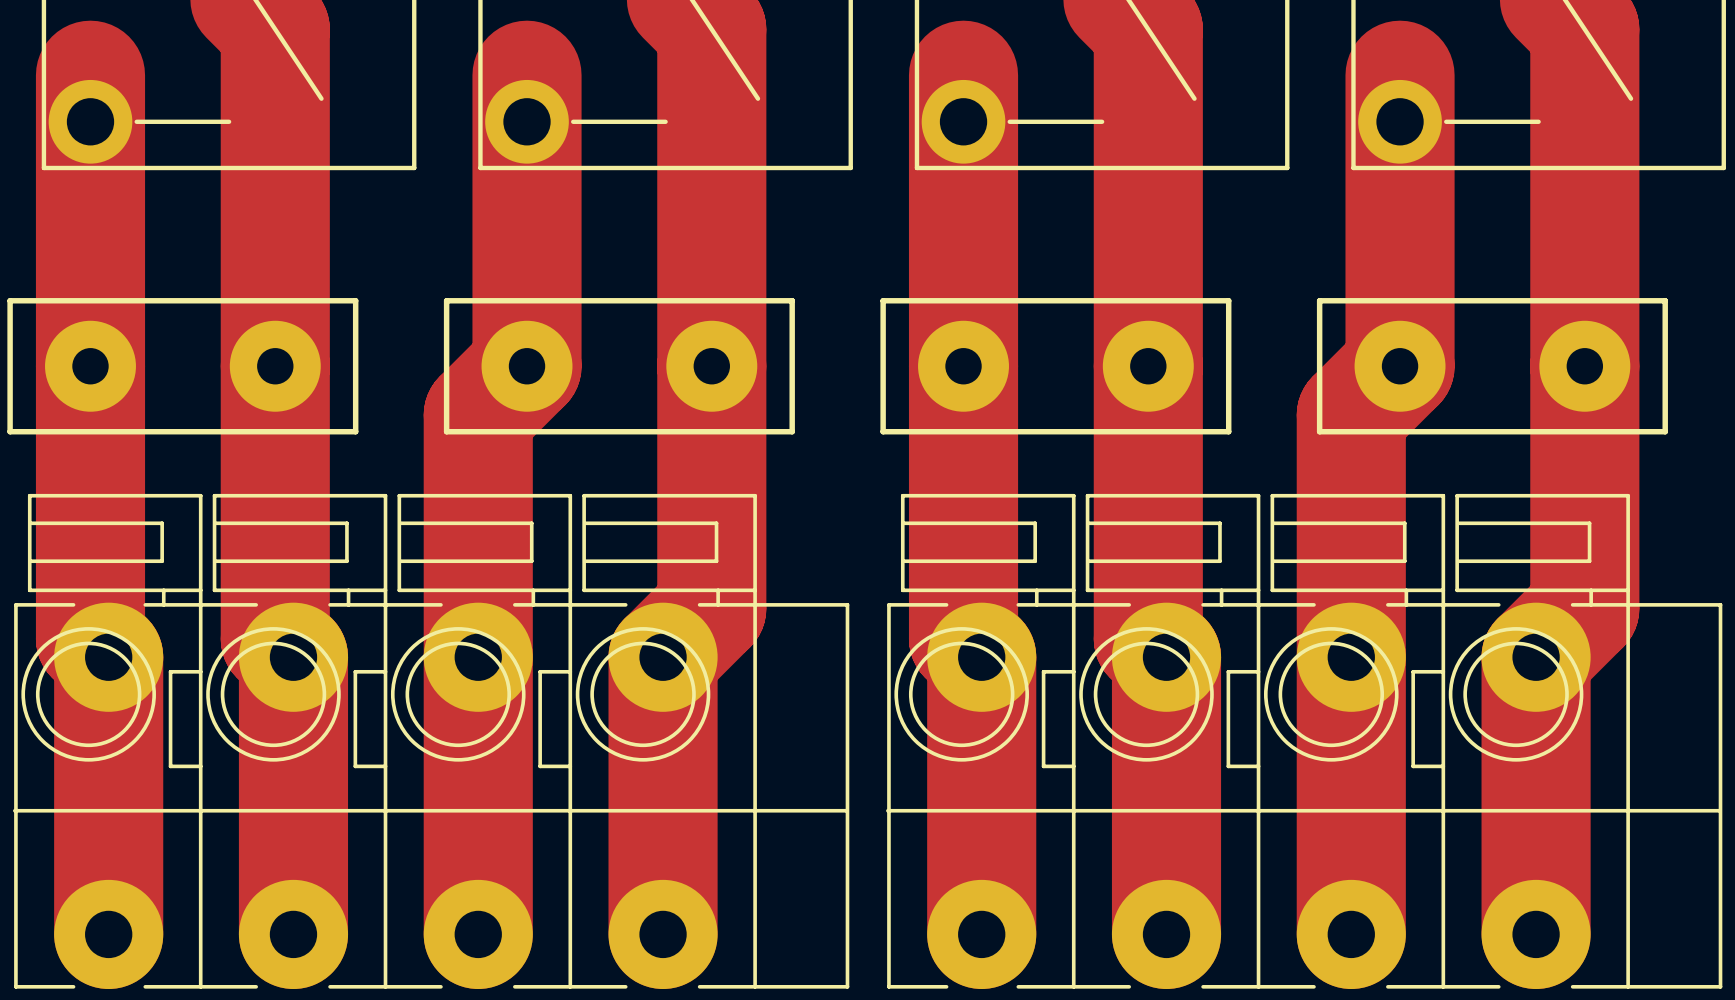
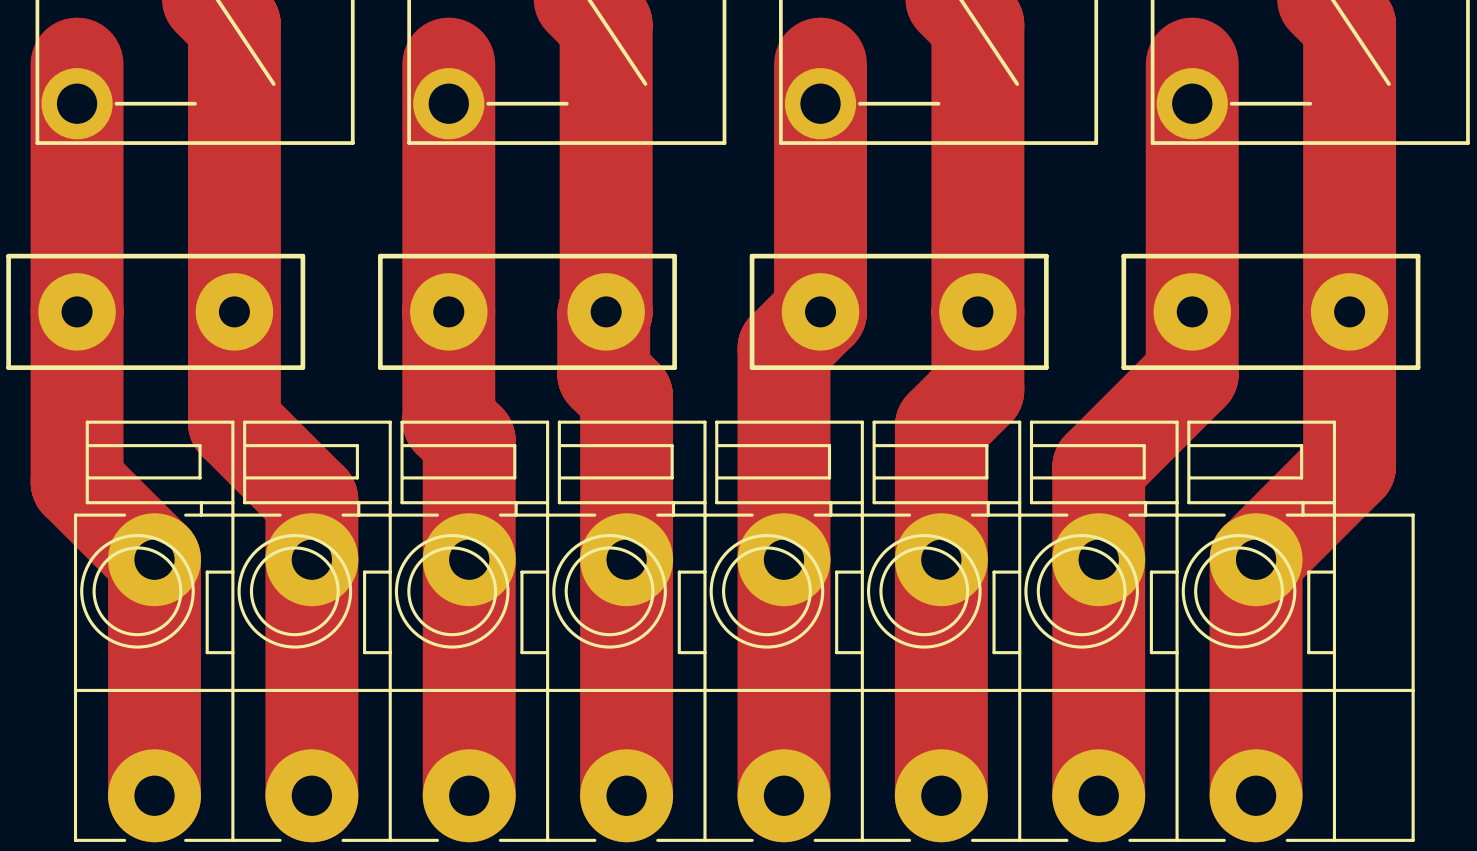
track: (527, 366) (478, 414) (478, 934) -> (448, 311) (448, 420) (469, 440) (469, 795)
track: (711, 366) (711, 608) (663, 657) (663, 934) -> (606, 311) (603, 314) (603, 373) (626, 396) (626, 795)
track: (963, 366) (963, 639) (981, 657) (981, 934) -> (820, 311) (783, 348) (783, 795)
track: (1400, 366) (1351, 414) (1351, 934) -> (1192, 311) (1192, 373) (1098, 467) (1098, 795)
track: (1148, 457) (1148, 639) (1166, 657) (1166, 934) -> (977, 389) (941, 426) (941, 795)
track: (275, 496) (275, 639) (293, 657) (293, 934) -> (234, 422) (311, 500) (311, 795)
track: (1584, 547) (1584, 608) (1536, 657) (1536, 934) -> (1349, 466) (1256, 559) (1256, 795)
track: (90, 566) (90, 639) (108, 657) (108, 934) -> (77, 482) (154, 559) (154, 795)
part: (431, 741) -> none
part: none -> (744, 631)
part: (1304, 741) -> none

